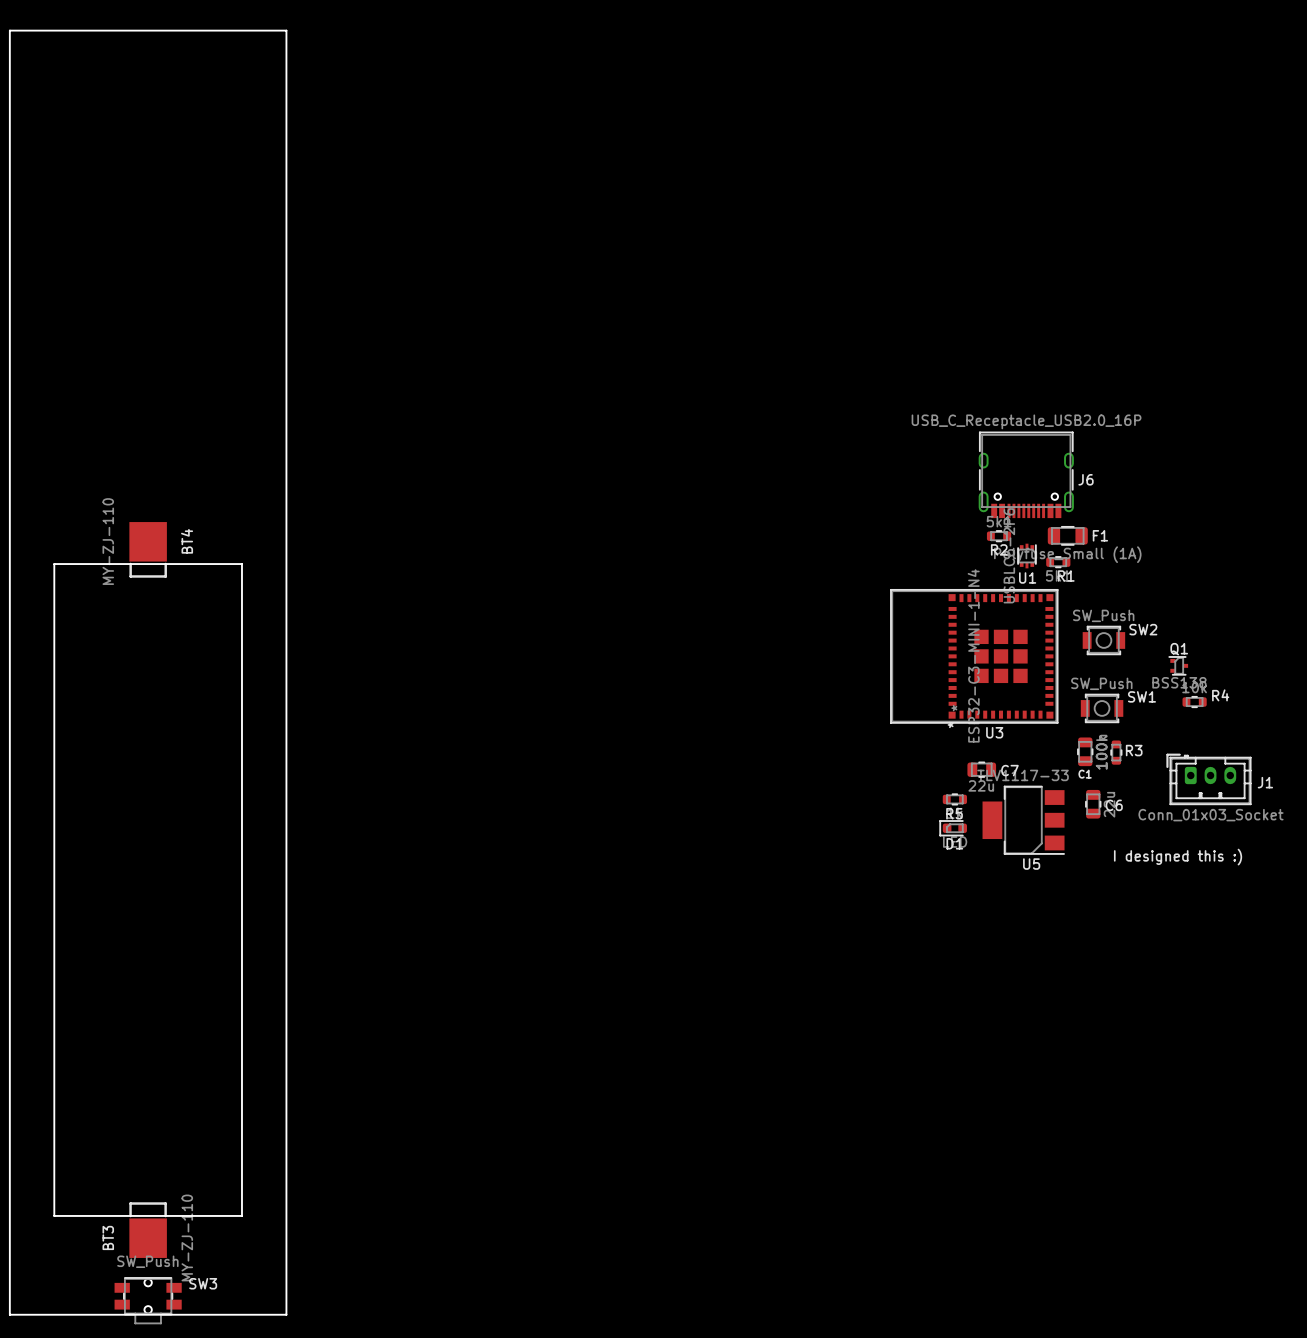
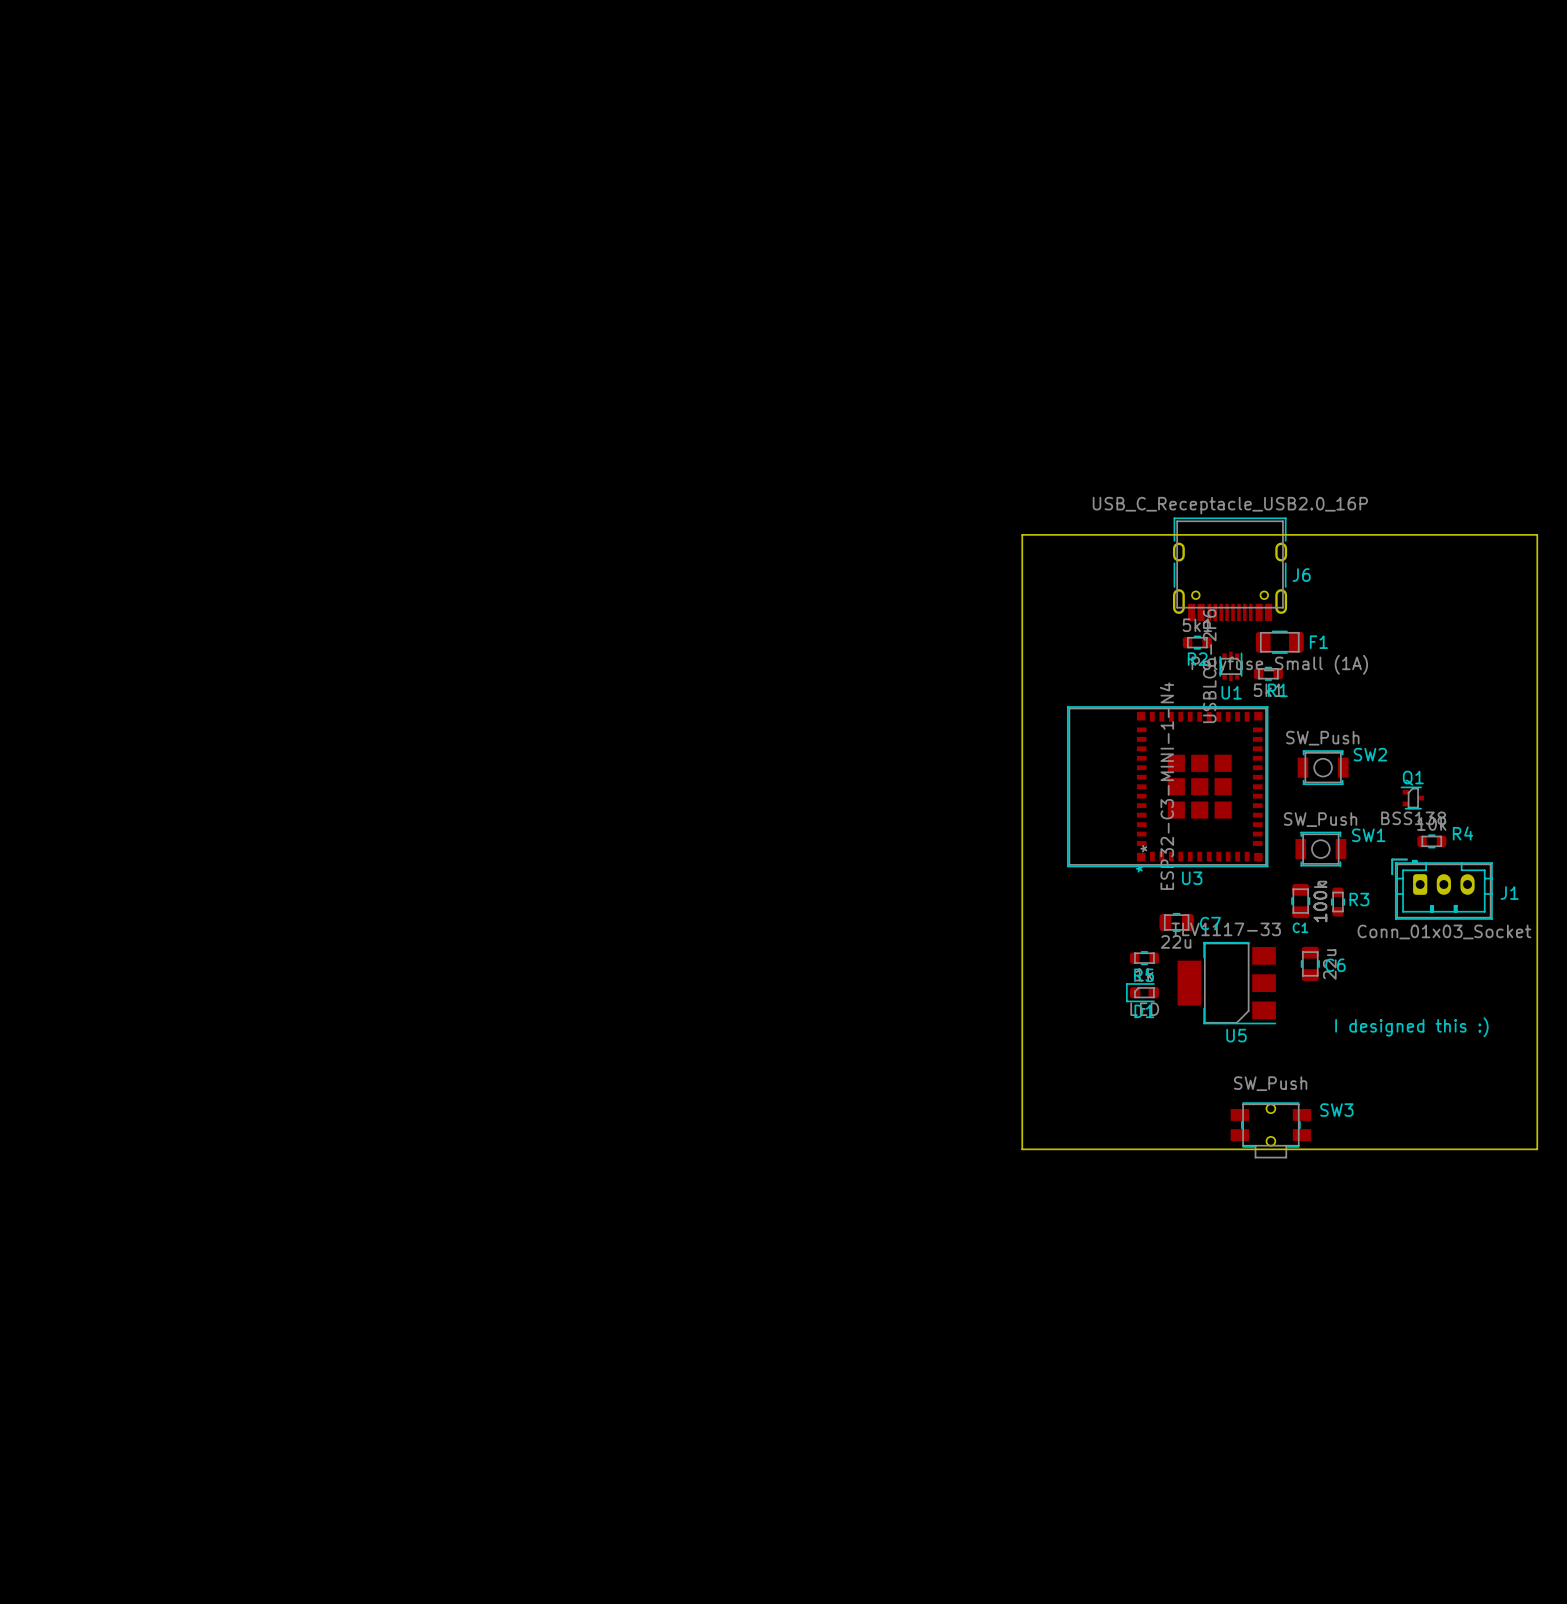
board edge: (9, 30) (286, 30) (286, 1314) (9, 1314) (9, 30) -> none
board edge: none -> (1022, 534) (1537, 534) (1537, 1149) (1022, 1149) (1022, 534)
BT4: MY-ZJ-110 (148, 549) -> none
board edge: (54, 564) (241, 564) (241, 1215) (54, 1215) (54, 564) -> none
J1 position: (1209, 779) -> (1442, 889)
BT3: MY-ZJ-110 (148, 1230) -> none
SW3 position: (148, 1300) -> (1270, 1130)

